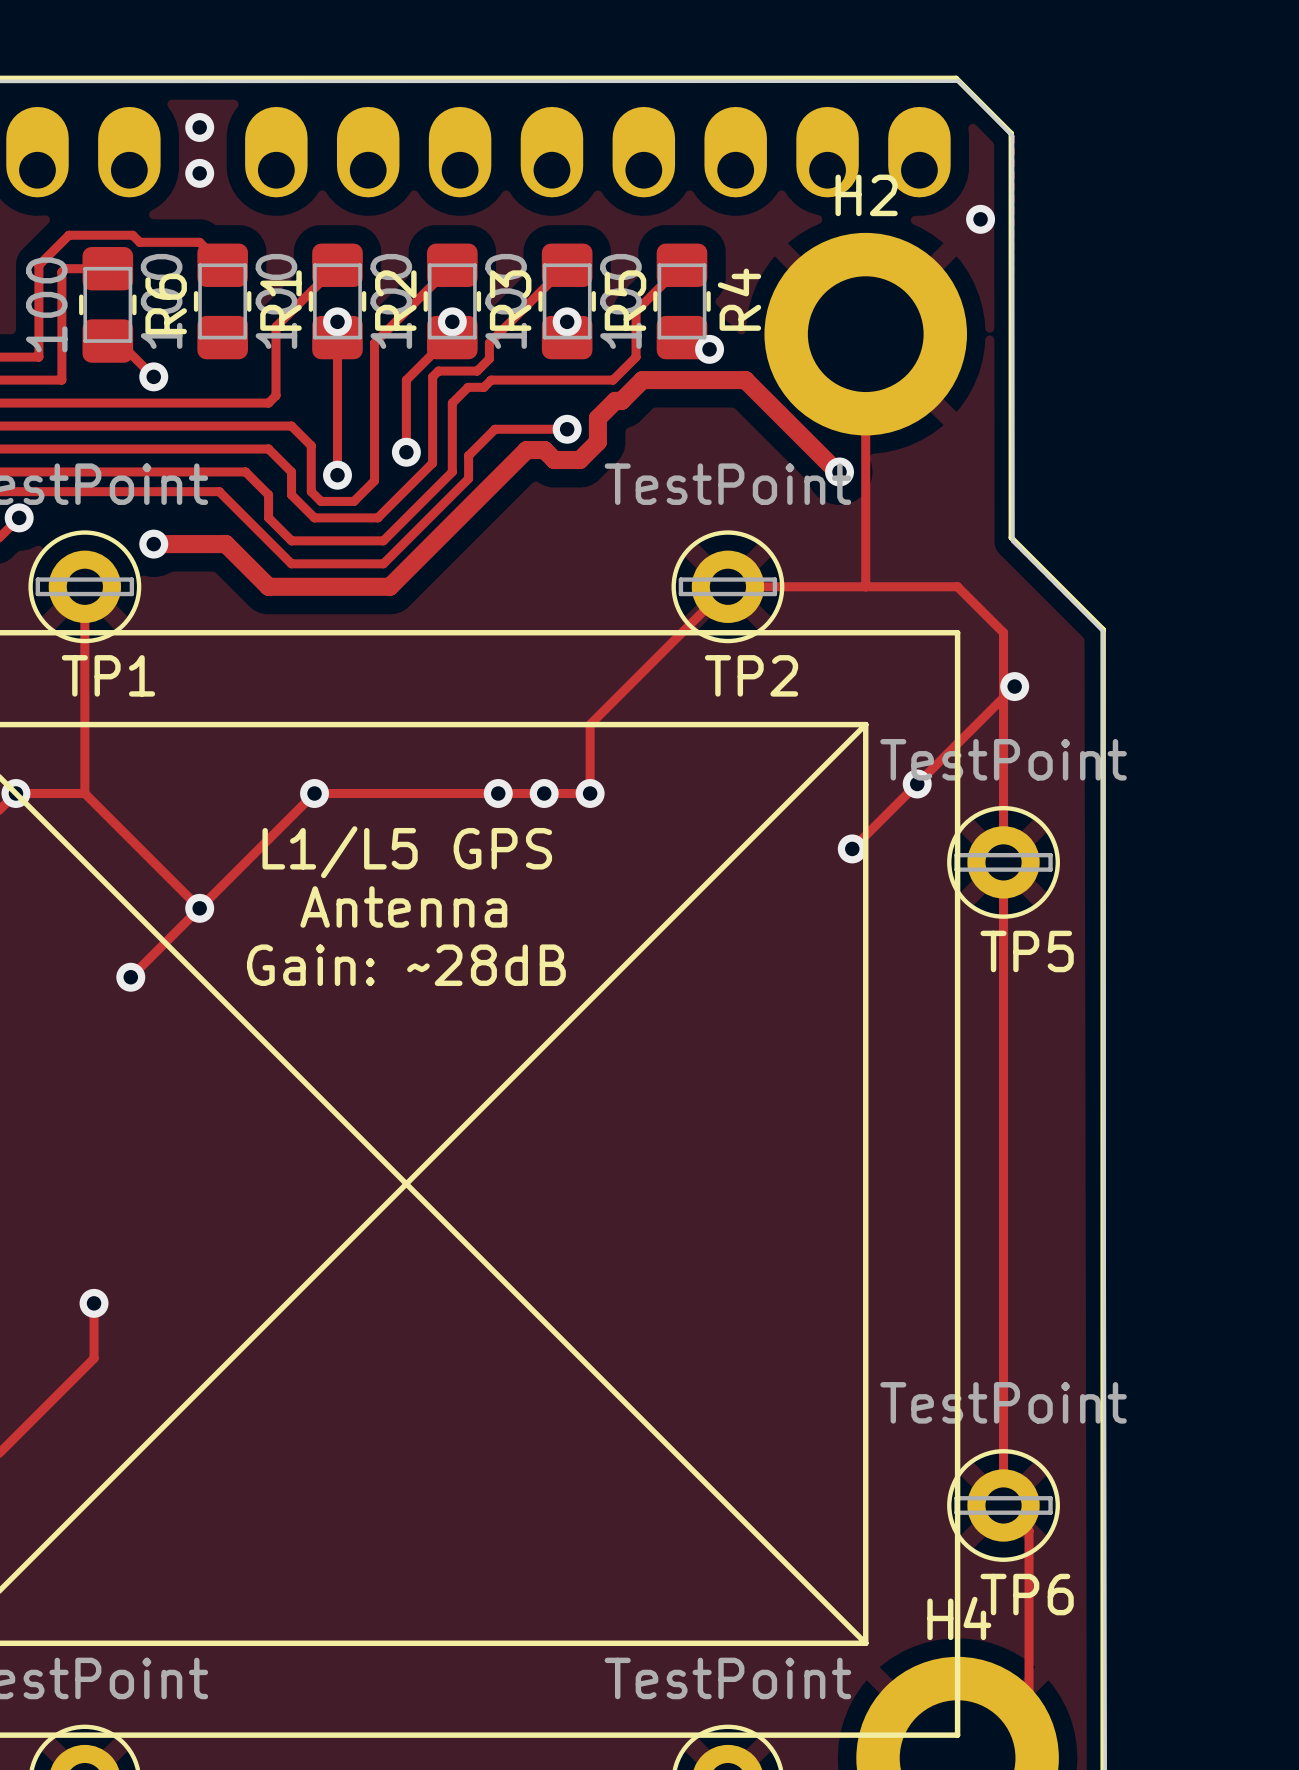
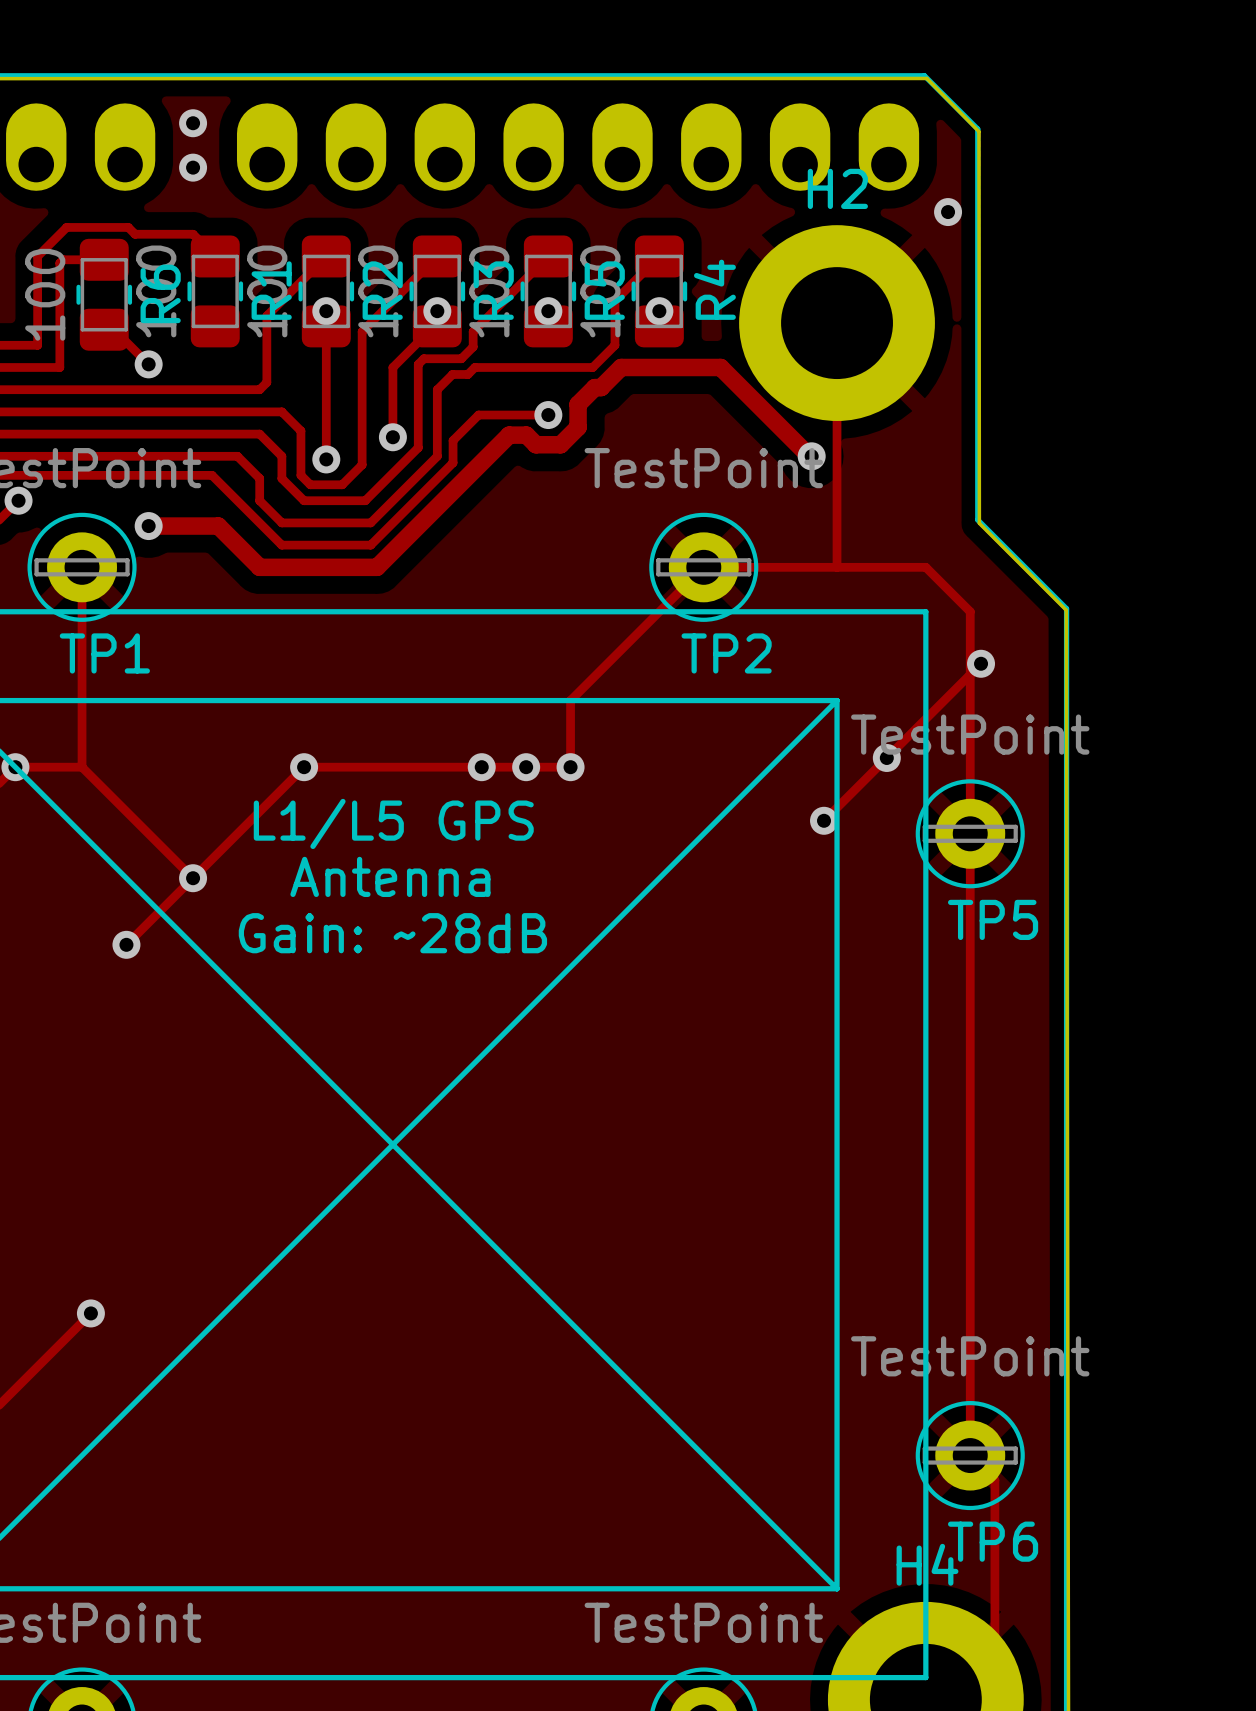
via position: (709, 349) -> (659, 311)
track: (94, 1303) (94, 1358) -> none
via position: (94, 1303) -> (90, 1313)

